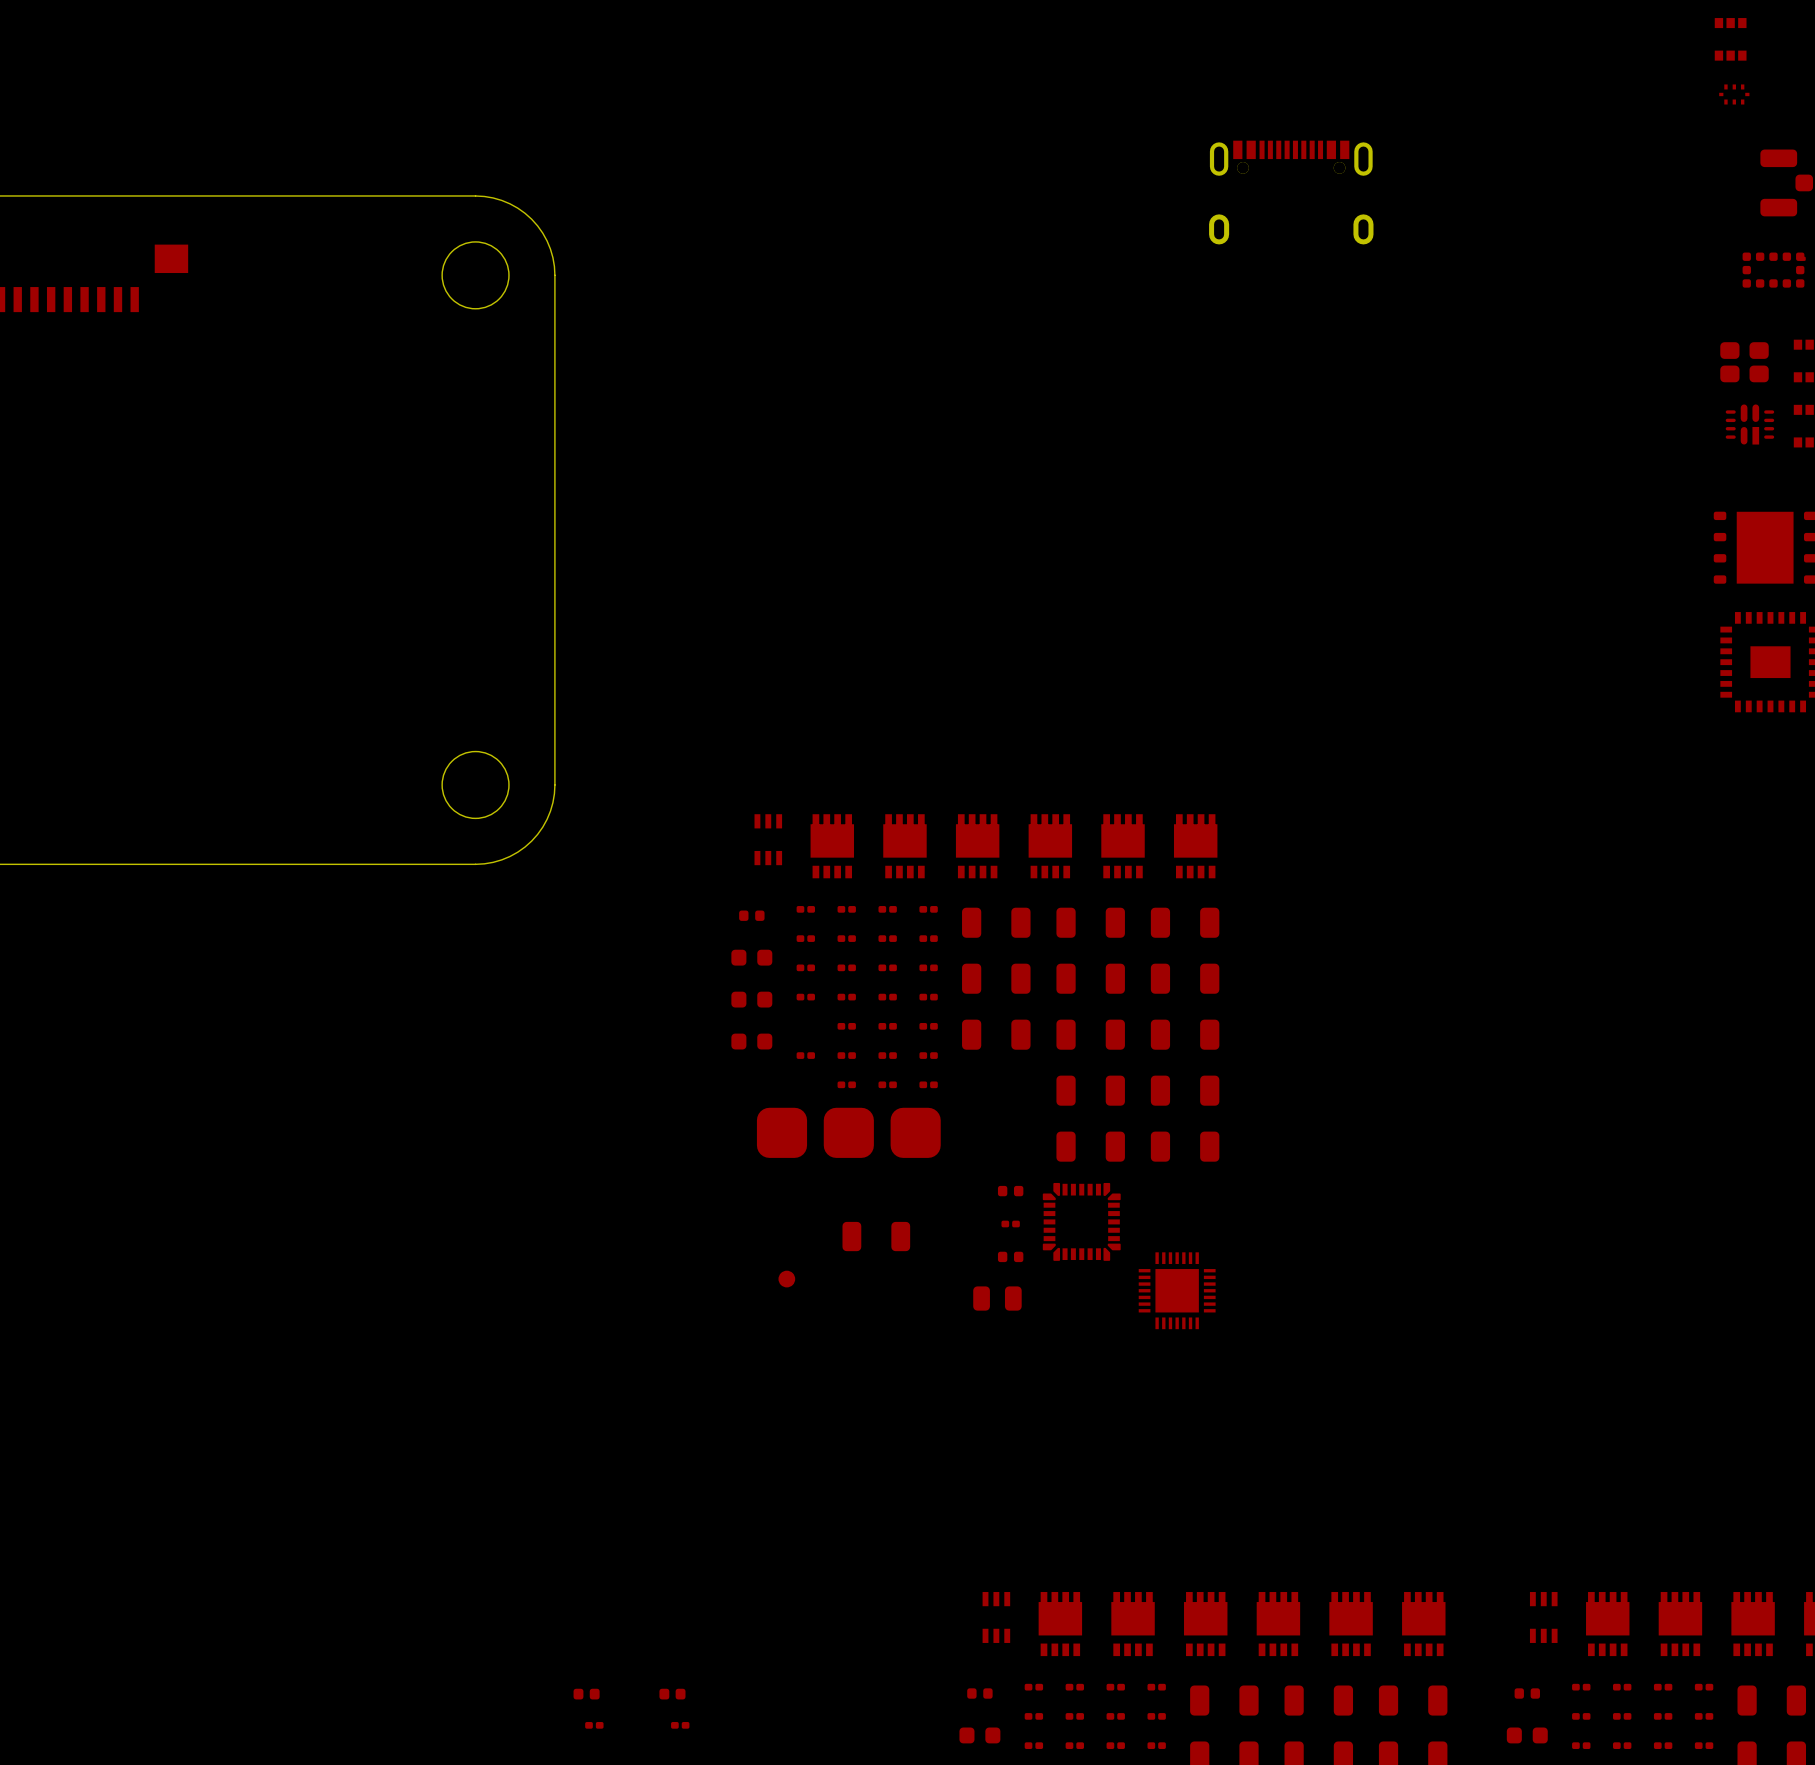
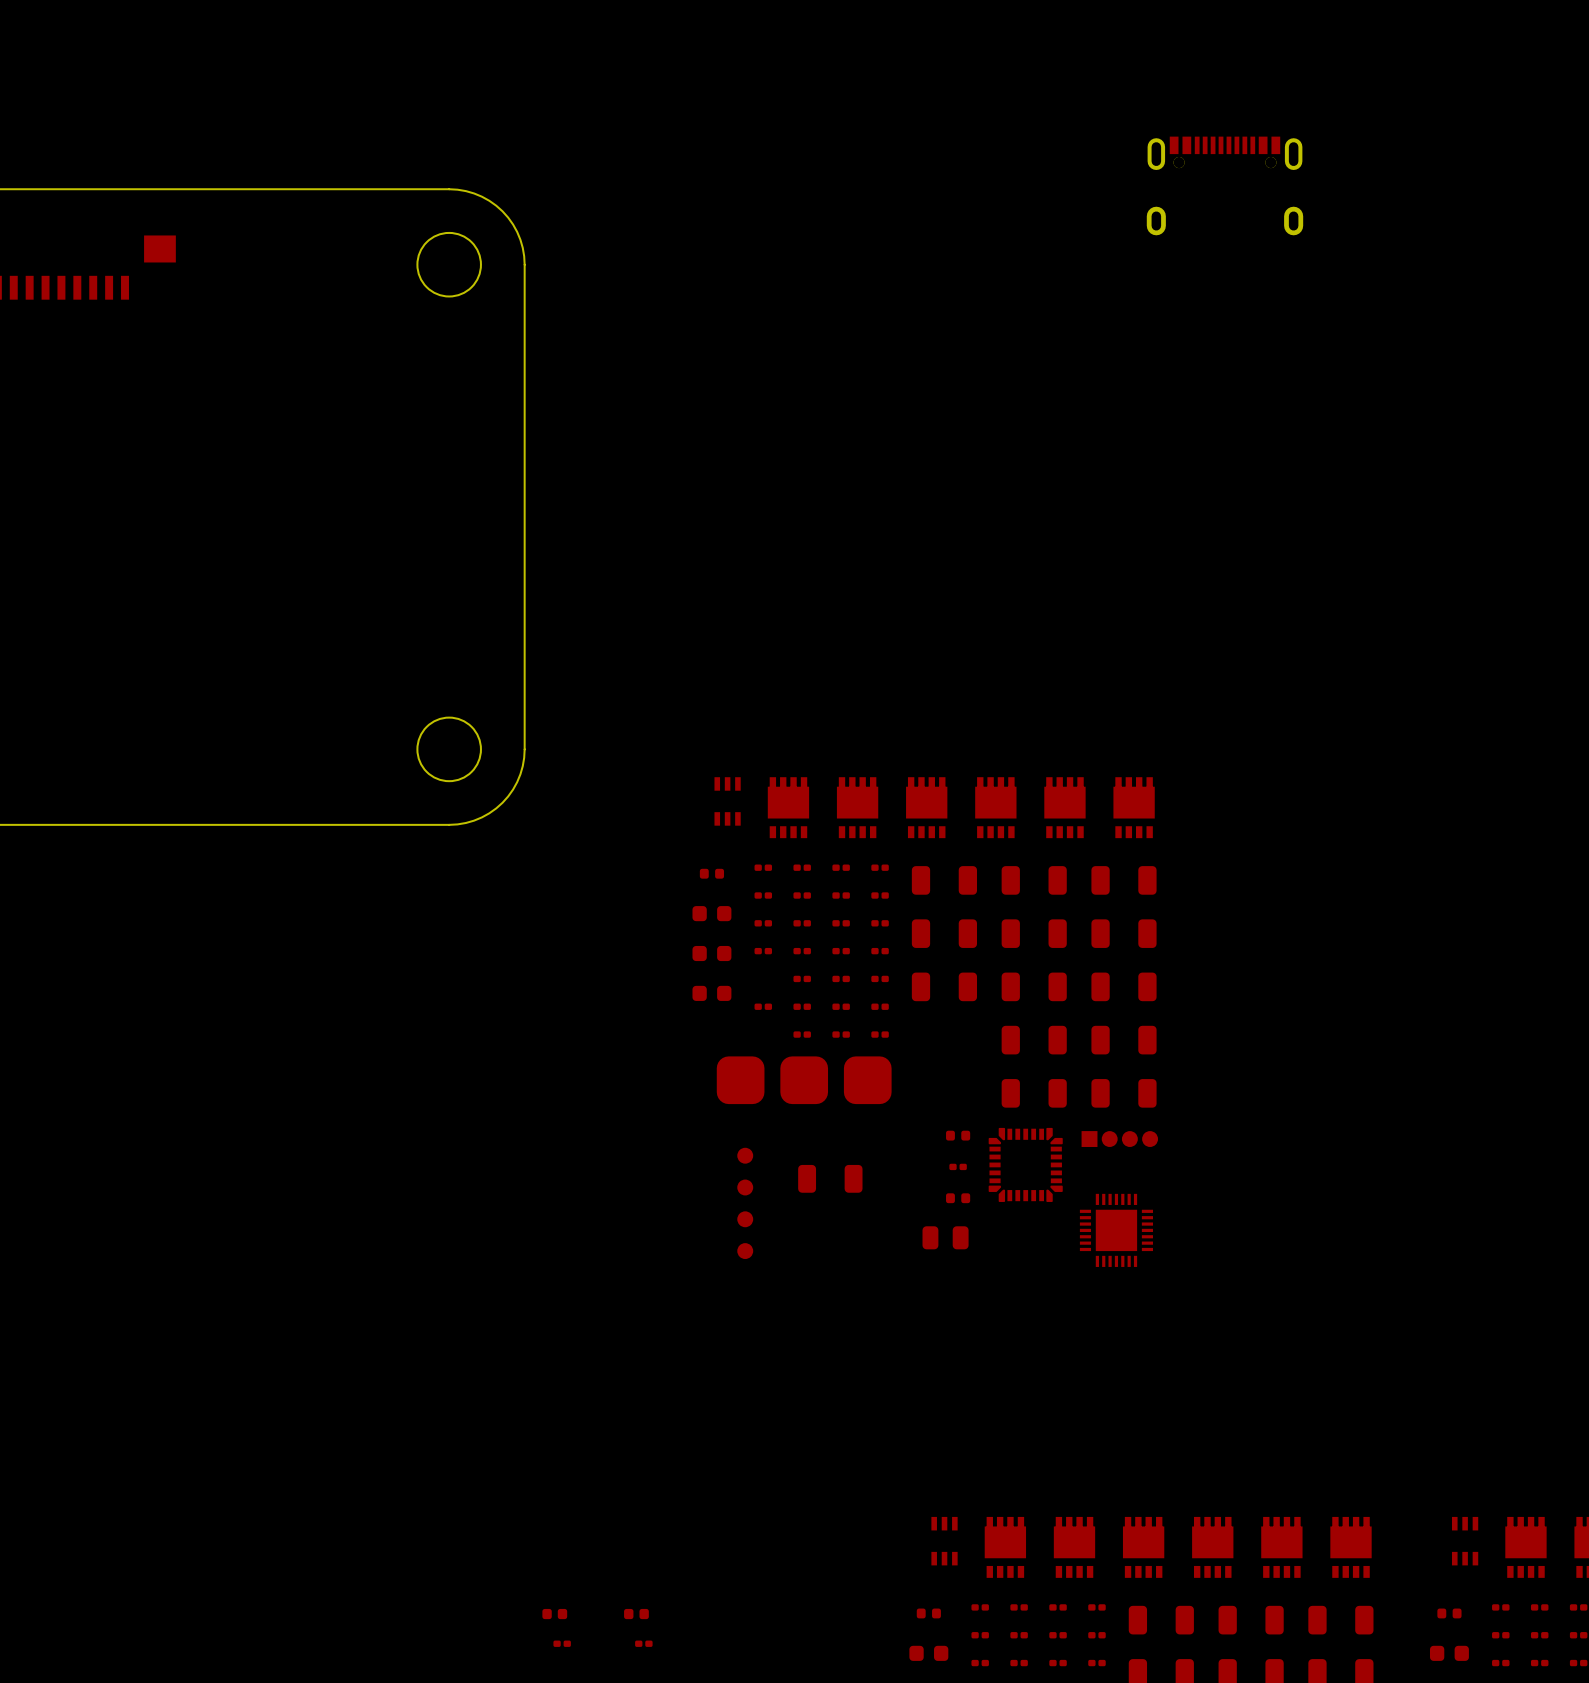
part: none -> (1119, 1139)
part: none -> (745, 1155)
part: none -> (745, 1187)
part: none -> (745, 1251)

